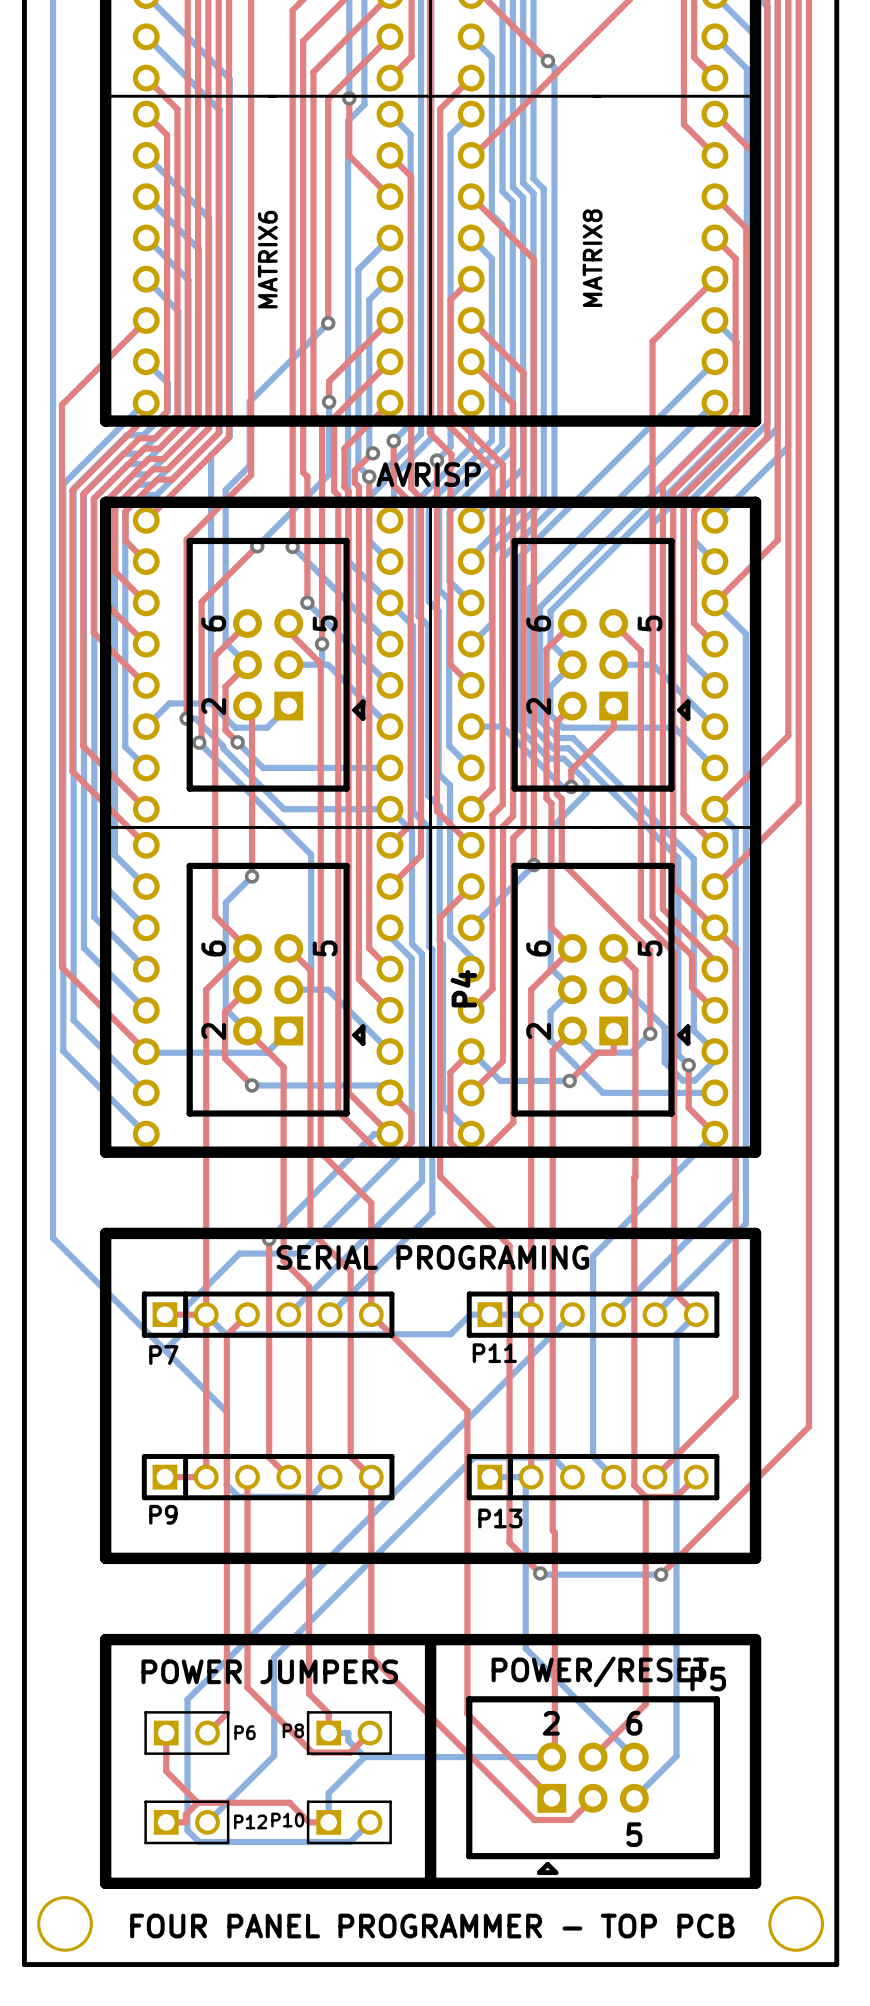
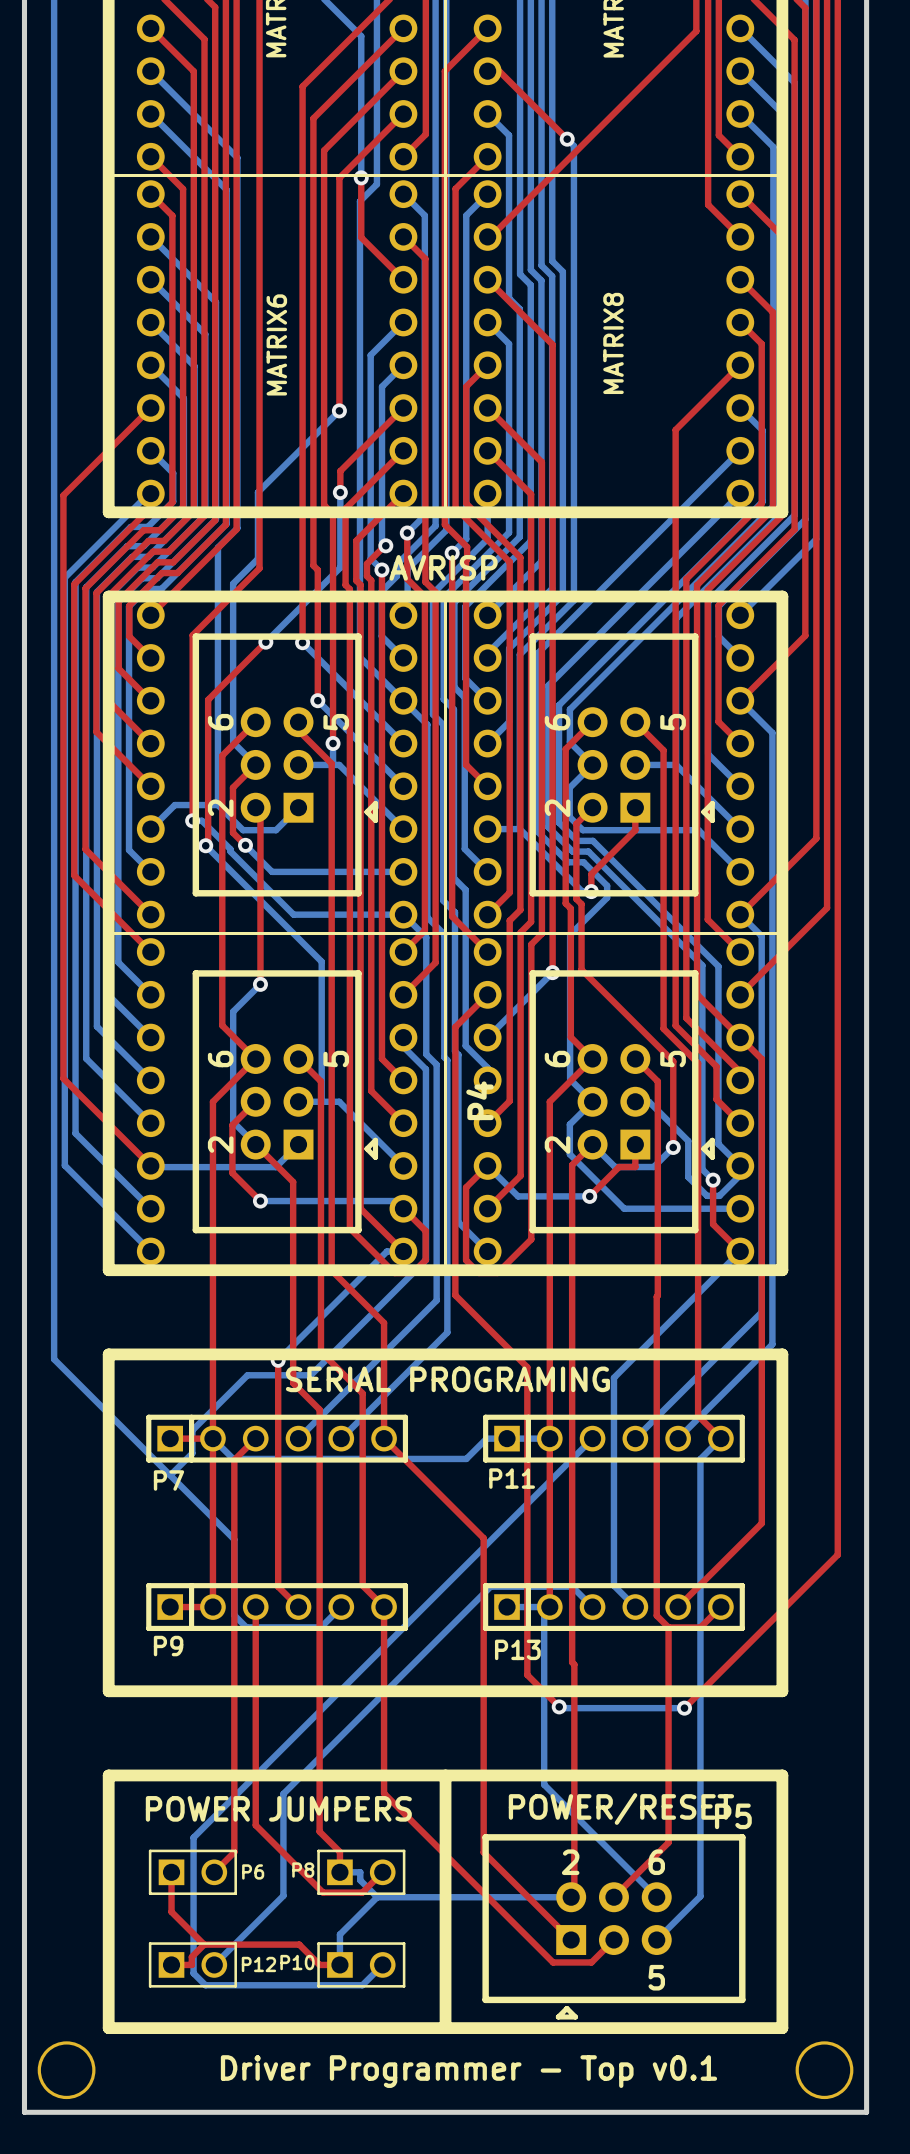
text: none -> Driver Programmer - Top v0.1 (468, 2071)
text: FOUR PANEL PROGRAMMER - TOP PCB (432, 1926) -> none

